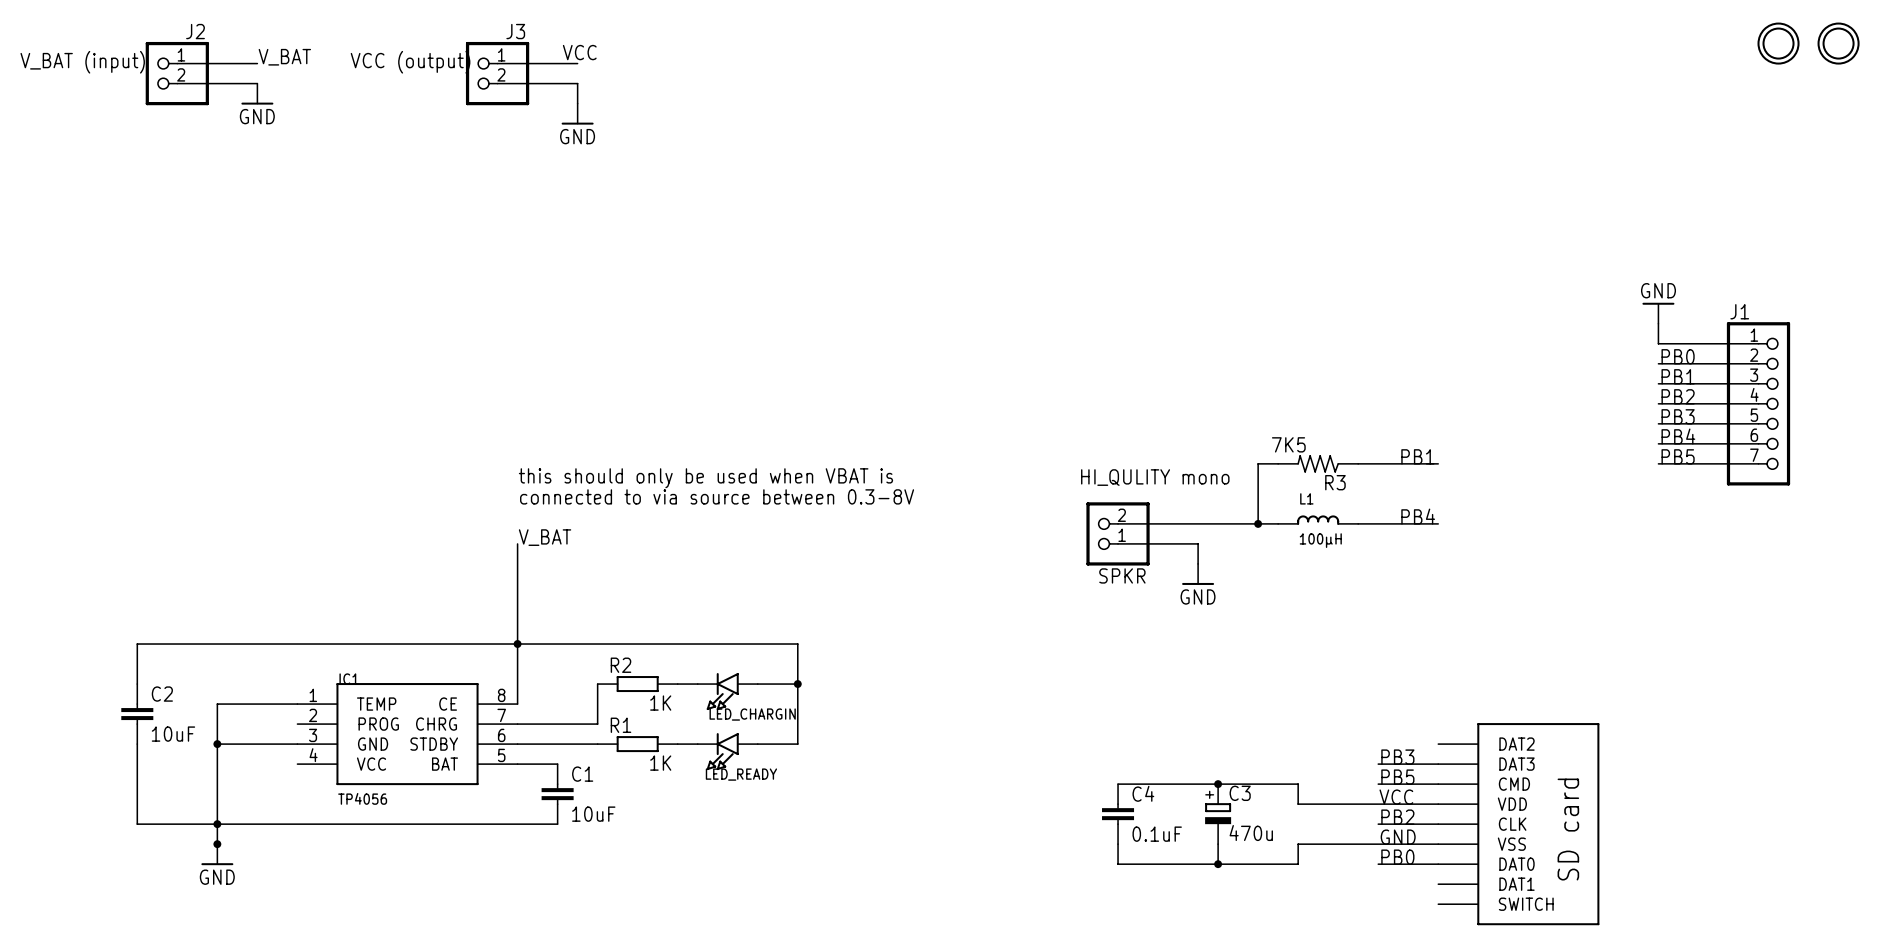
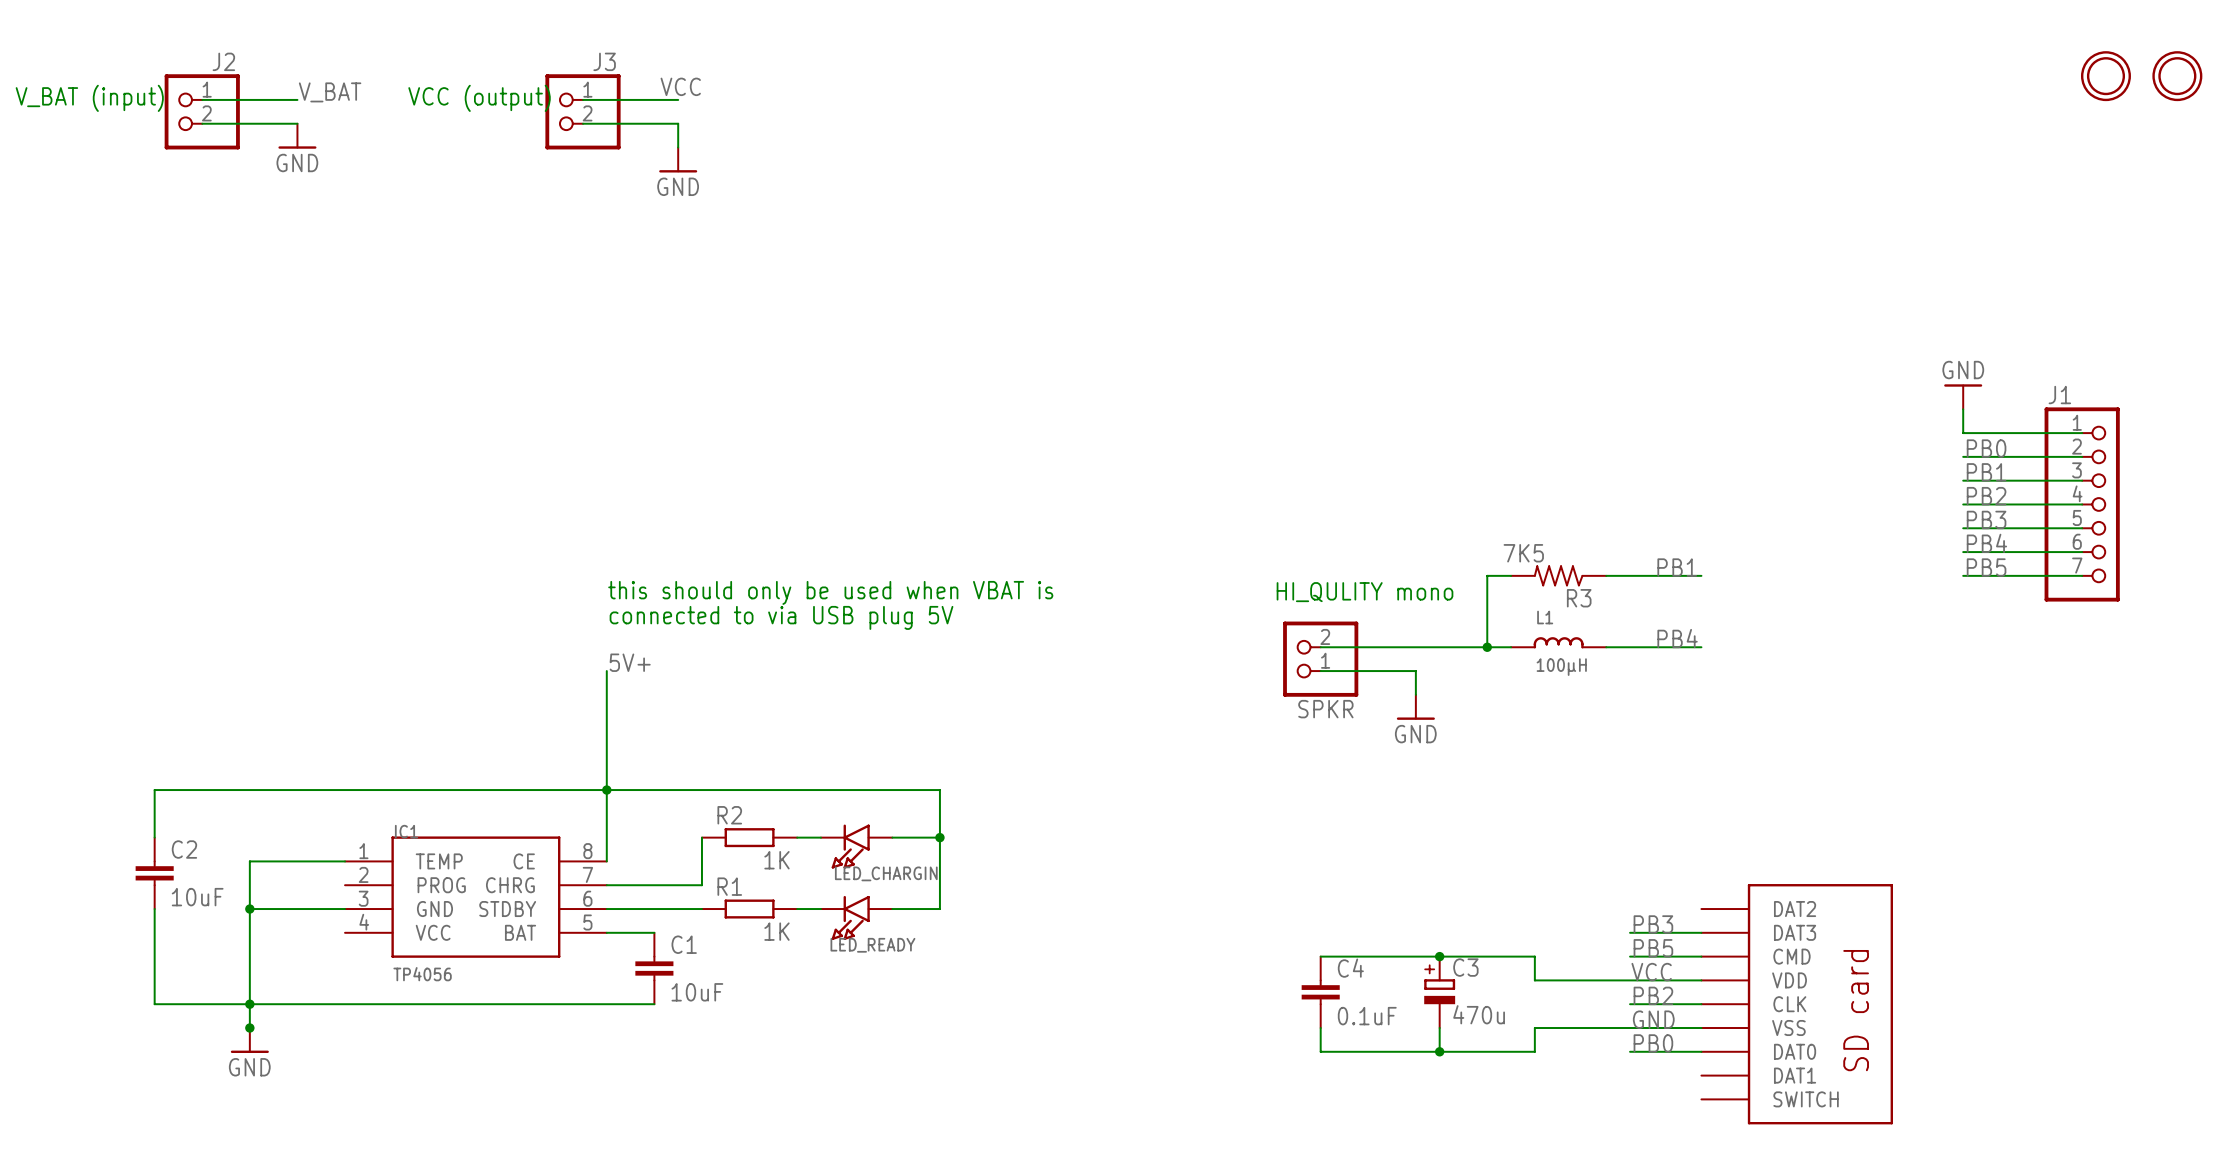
text: connected to via source between 0.3-8V (717, 496) -> connected to via USB plug 5V (781, 617)
label: V_BAT (545, 537) -> 5V+ (630, 662)

